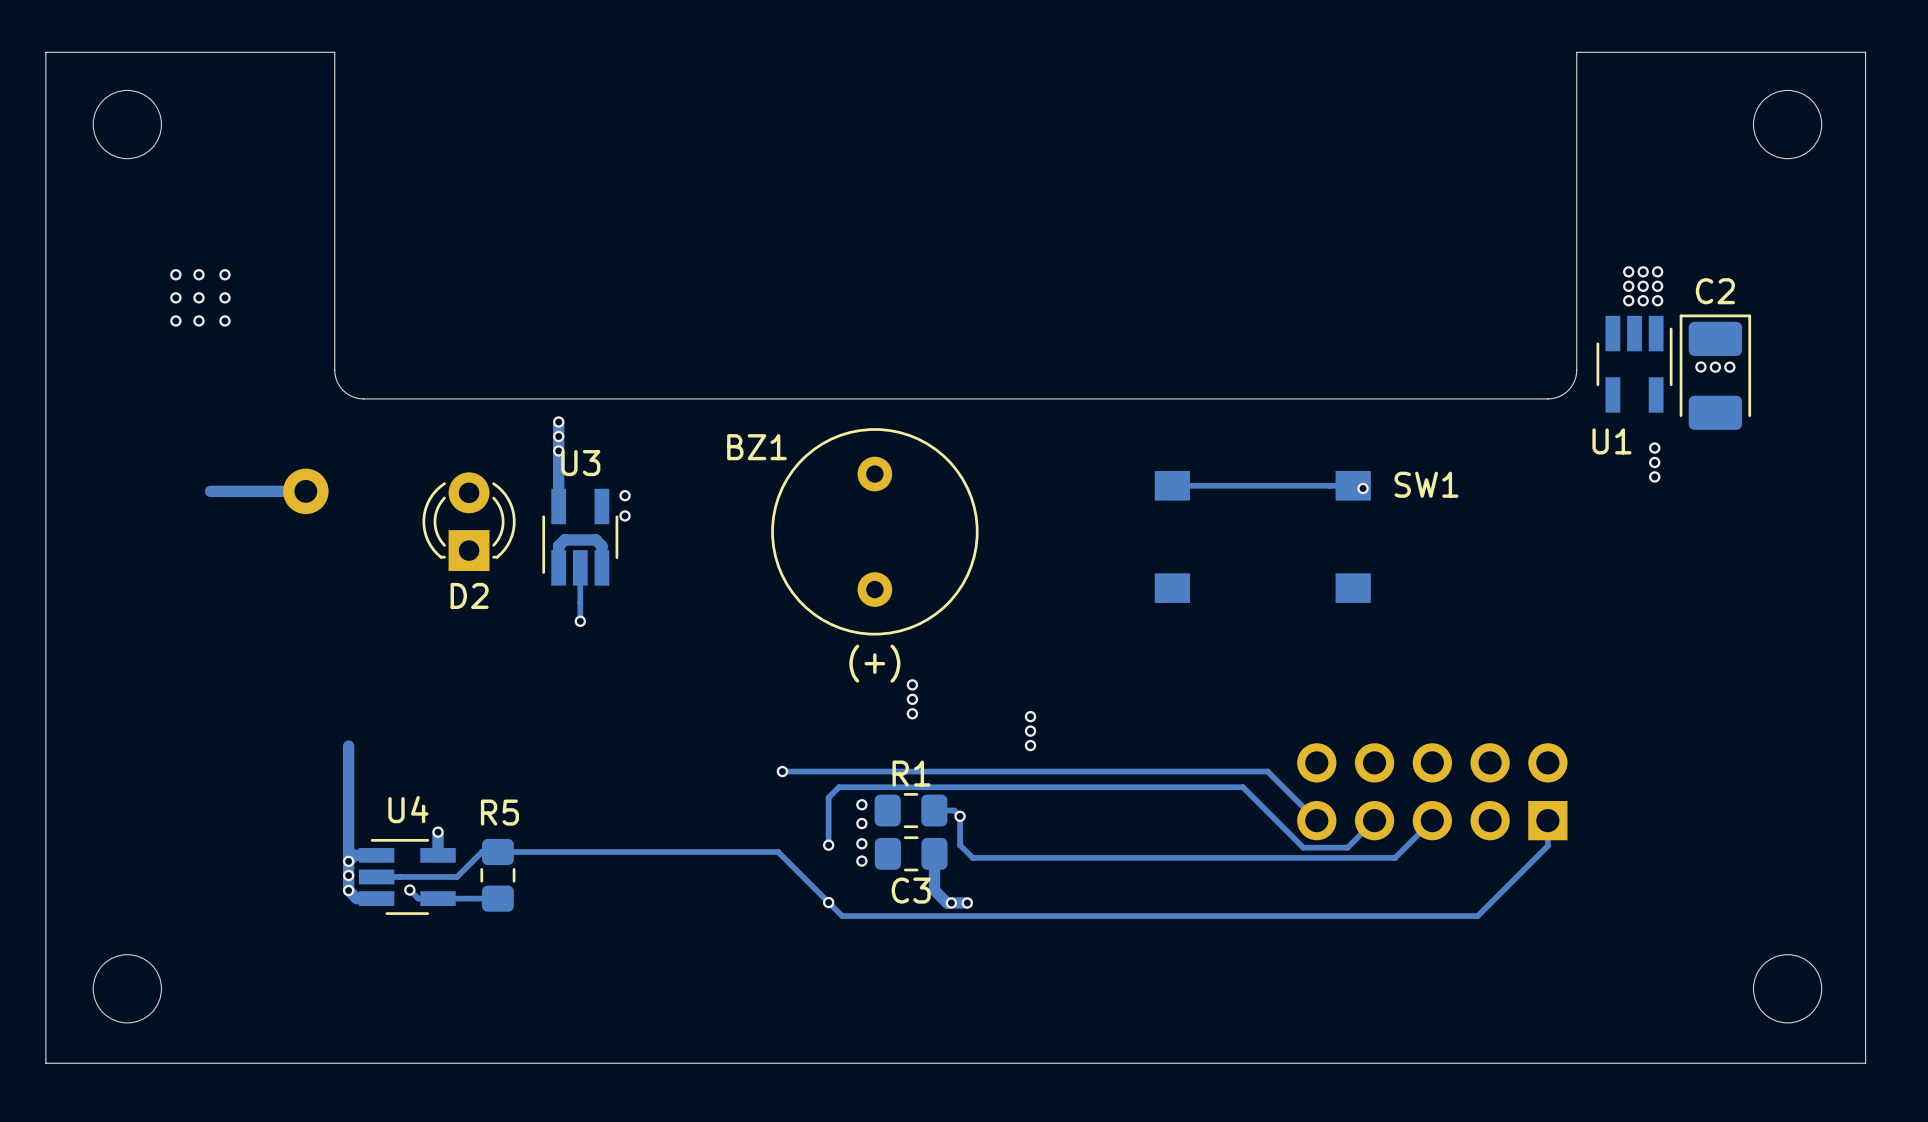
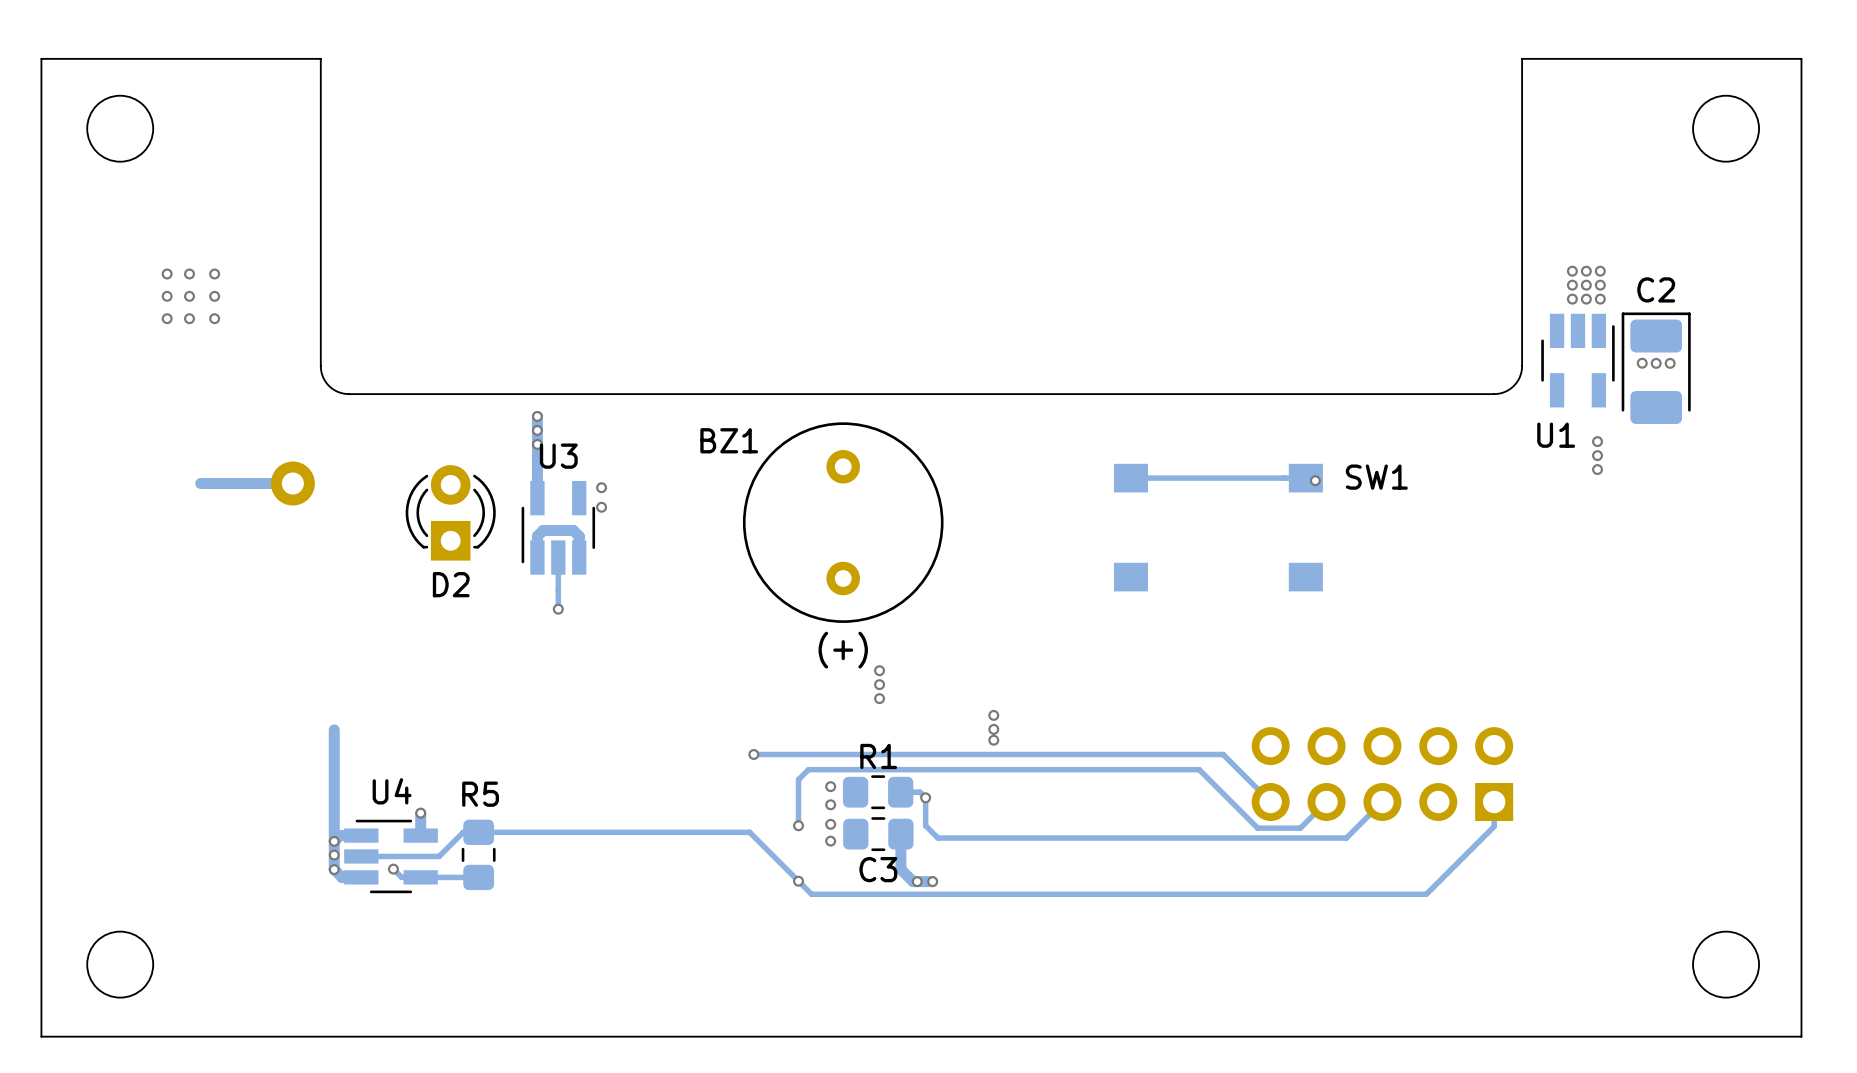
via position: (1030, 716) -> (993, 740)

